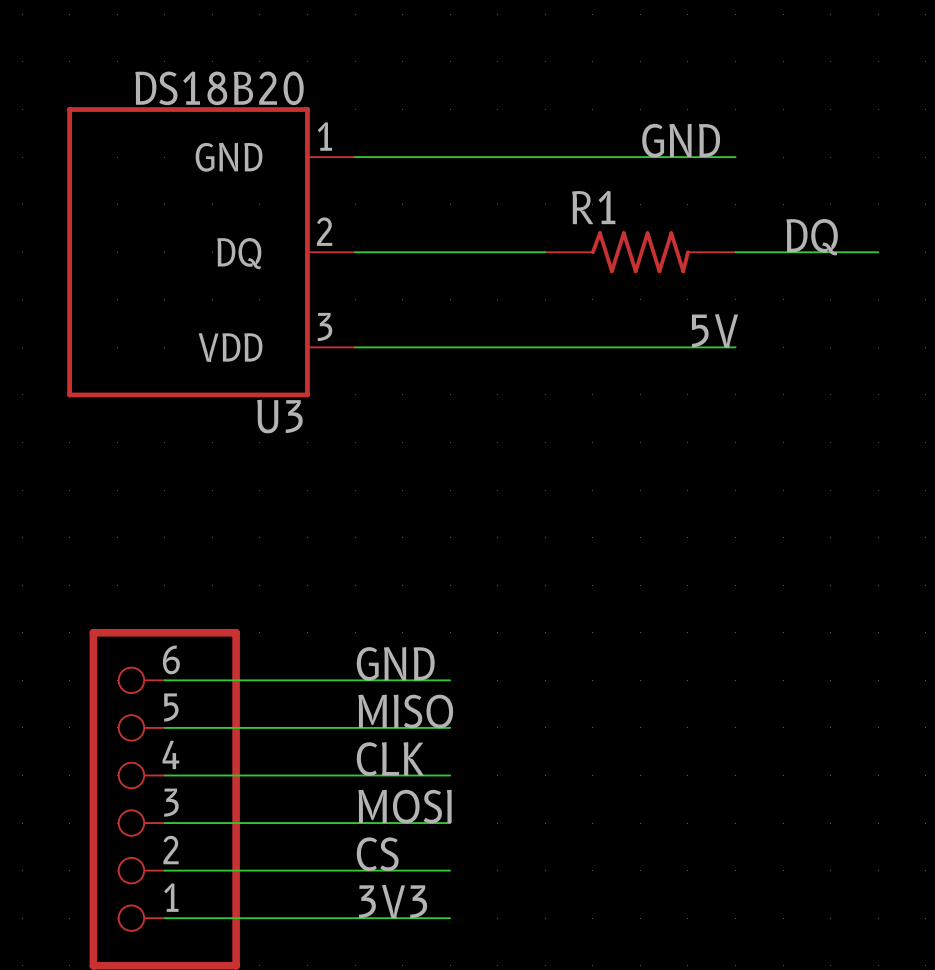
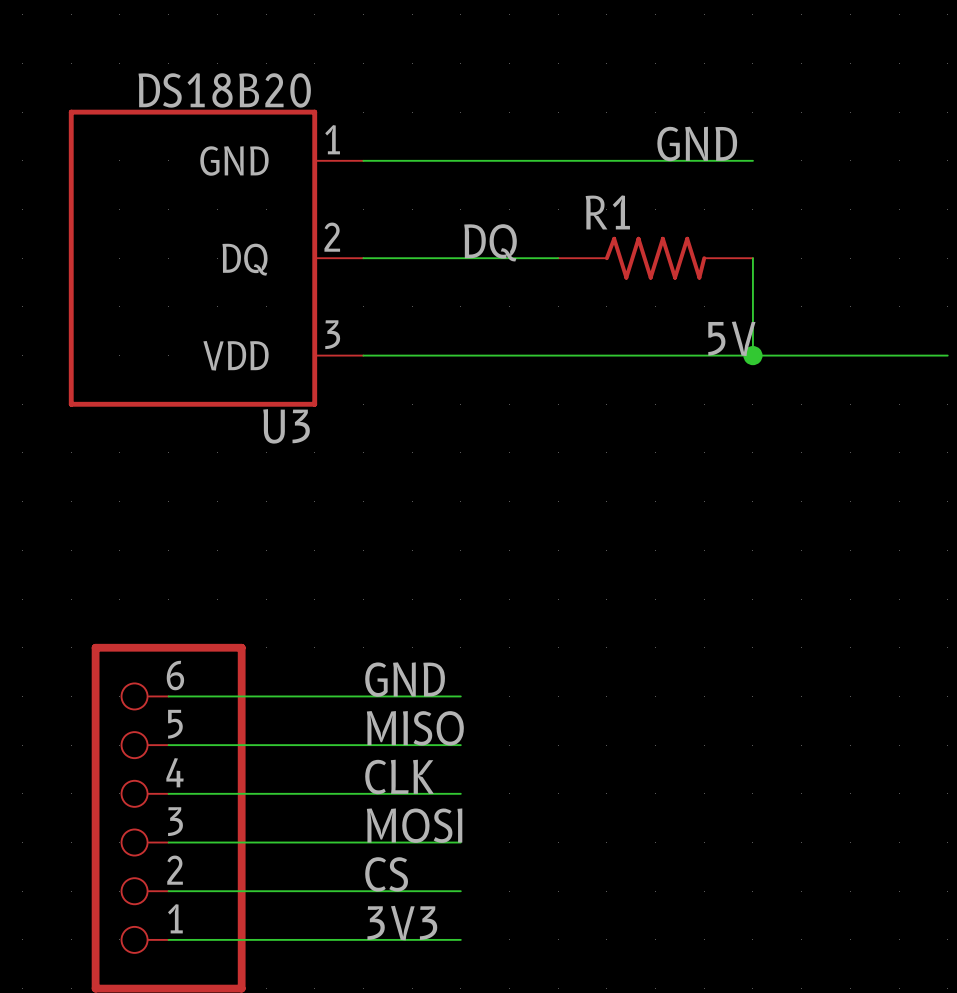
label position: DQ (812, 237) -> DQ (490, 242)
wire: (735, 252) (878, 252) -> (752, 258) (752, 355) (947, 355)
junction: none -> (752, 355)

